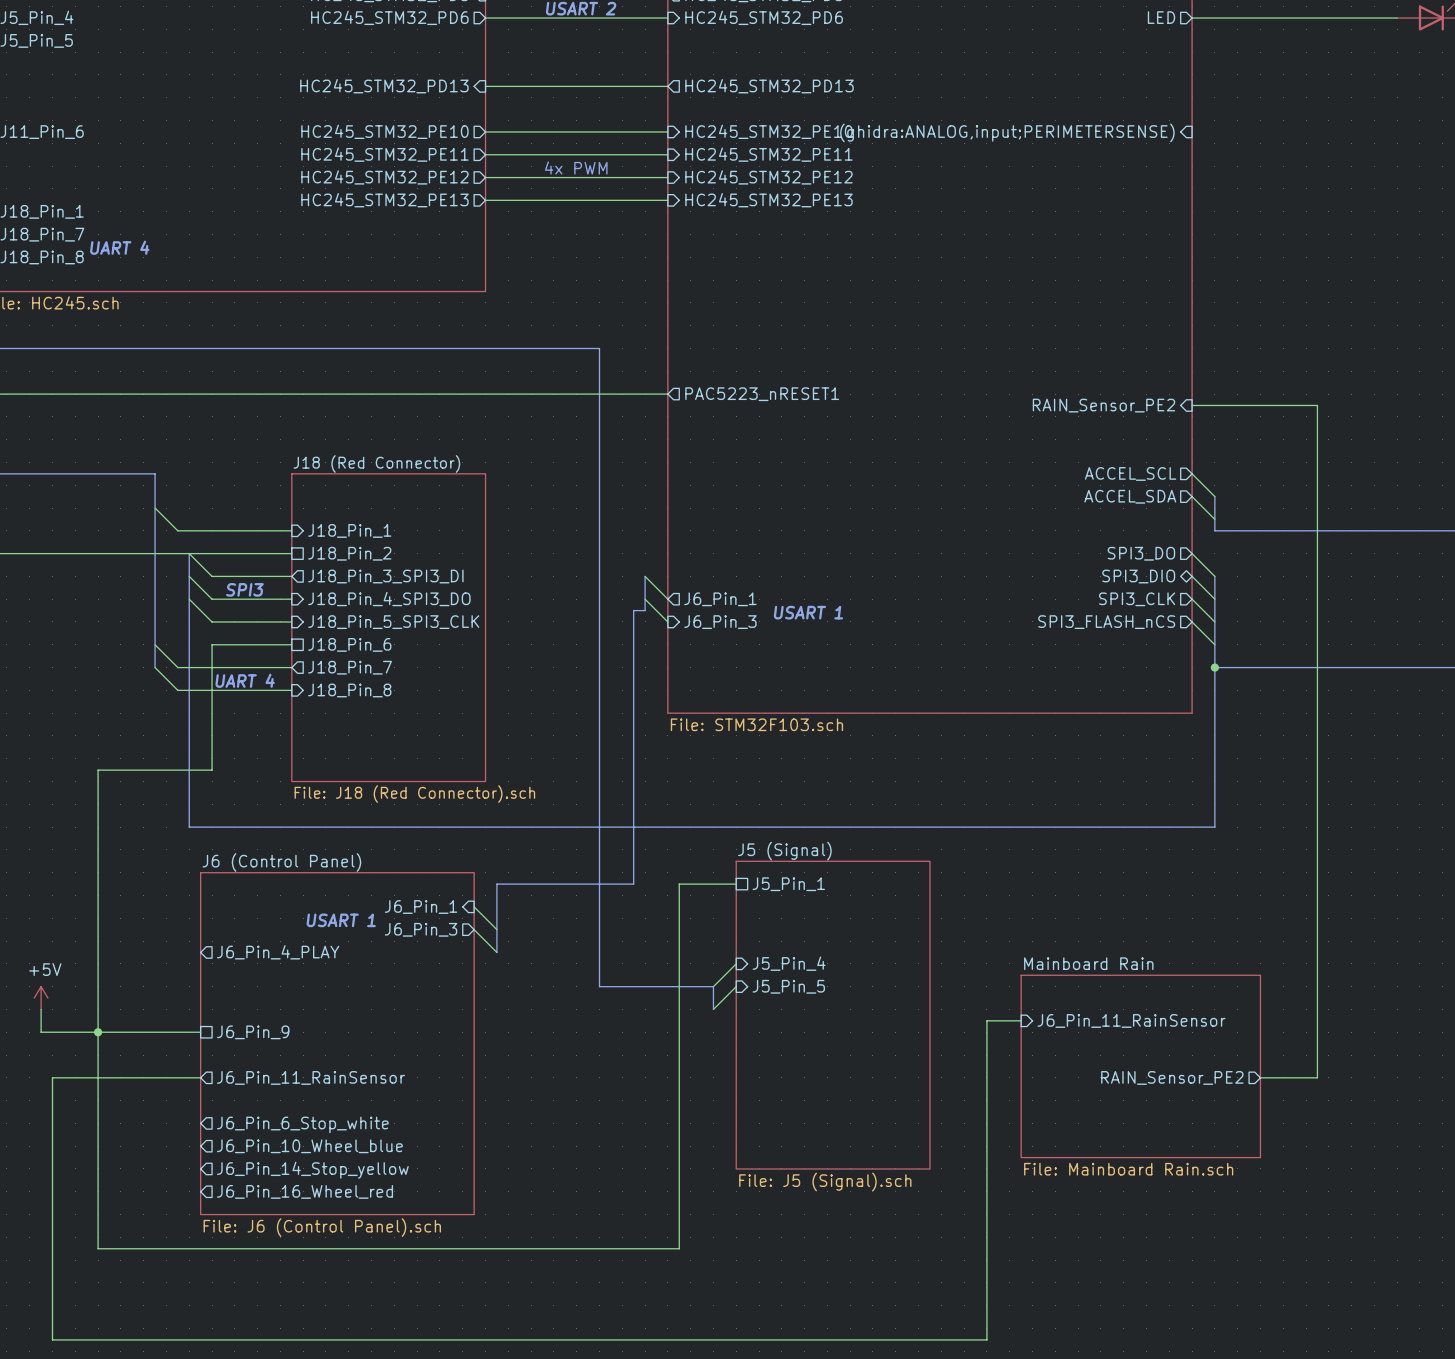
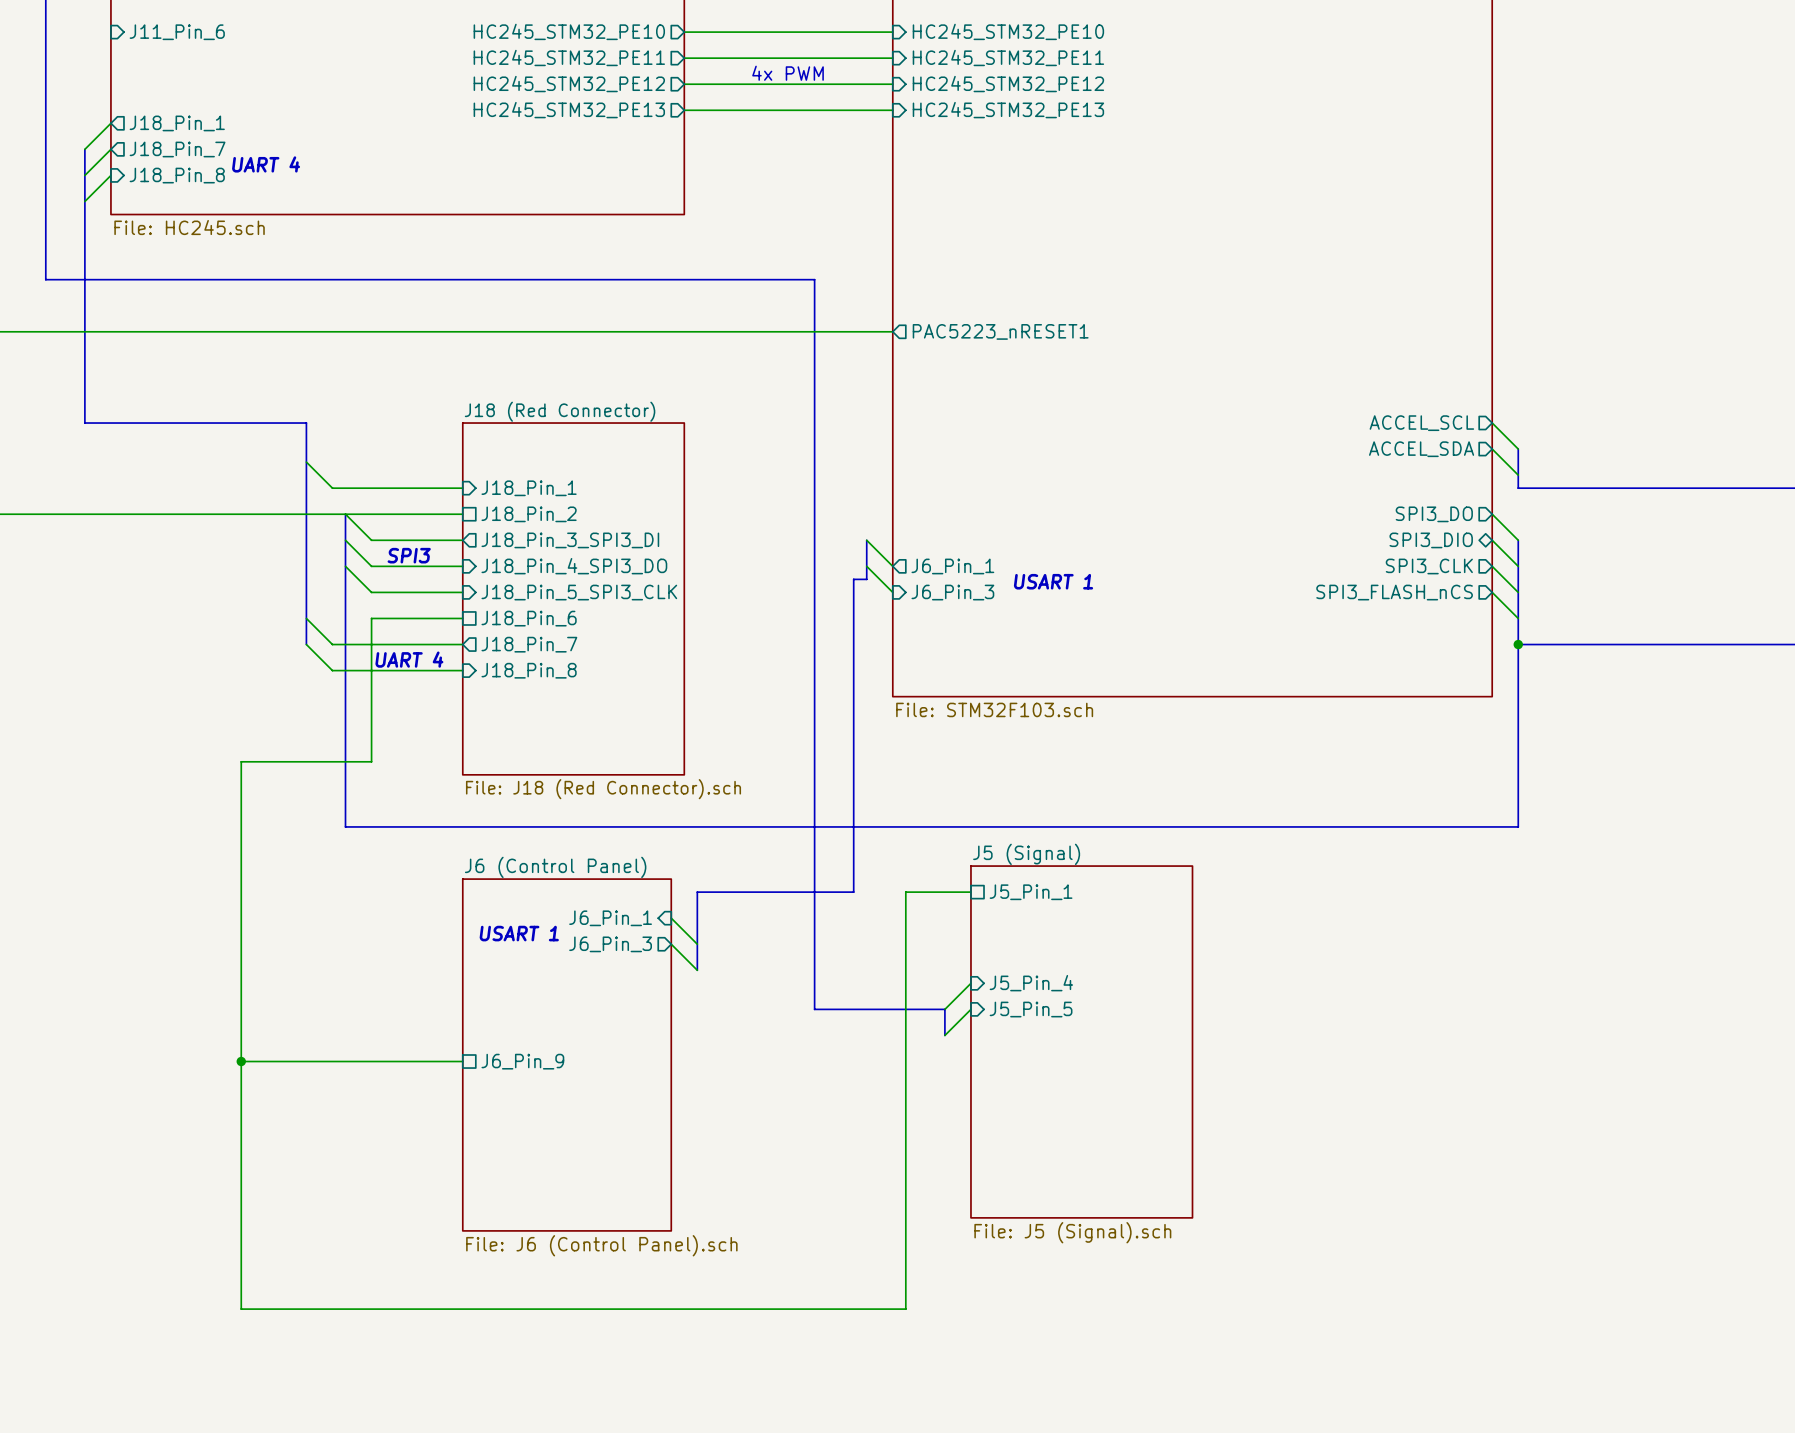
sheet pin: (ghidra:ANALOG,input;PERIMETERSENSE) (1007, 132) -> none
sheet pin: RAIN_Sensor_PE2 (1103, 405) -> none
wire: (1192, 405) (1317, 405) (1317, 1077) (1260, 1077) -> none
sheet J6 (Control Panel) name position: J6 (Control Panel) (281, 862) -> J6 (Control Panel) (555, 867)
sheet J6 (Control Panel) shape: [200, 872, 475, 1215] -> [462, 879, 672, 1231]
sheet pin: J6_Pin_4_PLAY (278, 952) -> none
power symbol: +5V (41, 998) -> none
wire: (41, 1009) (41, 1032) (98, 1032) -> none
wire: (1021, 1020) (986, 1020) (986, 1339) (52, 1339) (52, 1077) (200, 1077) -> none
sheet pin: J6_Pin_11_RainSensor (1131, 1020) -> none
wire: none -> (358, 1061) (462, 1061)
sheet pin position: J6_Pin_9 (253, 1032) -> J6_Pin_9 (522, 1061)
sheet Mainboard Rain: File: Mainboard Rain.sch (1140, 1066) -> none
sheet pin: J6_Pin_11_RainSensor (310, 1077) -> none
sheet pin: RAIN_Sensor_PE2 (1172, 1077) -> none
sheet pin: J6_Pin_6_Stop_white (302, 1124) -> none
sheet pin: J6_Pin_10_Wheel_blue (309, 1146) -> none
sheet pin: J6_Pin_14_Stop_yellow (312, 1170) -> none
sheet pin: J6_Pin_16_Wheel_red (305, 1191) -> none
sheet J6 (Control Panel) value position: File: J6 (Control Panel).sch (322, 1227) -> File: J6 (Control Panel).sch (601, 1245)

